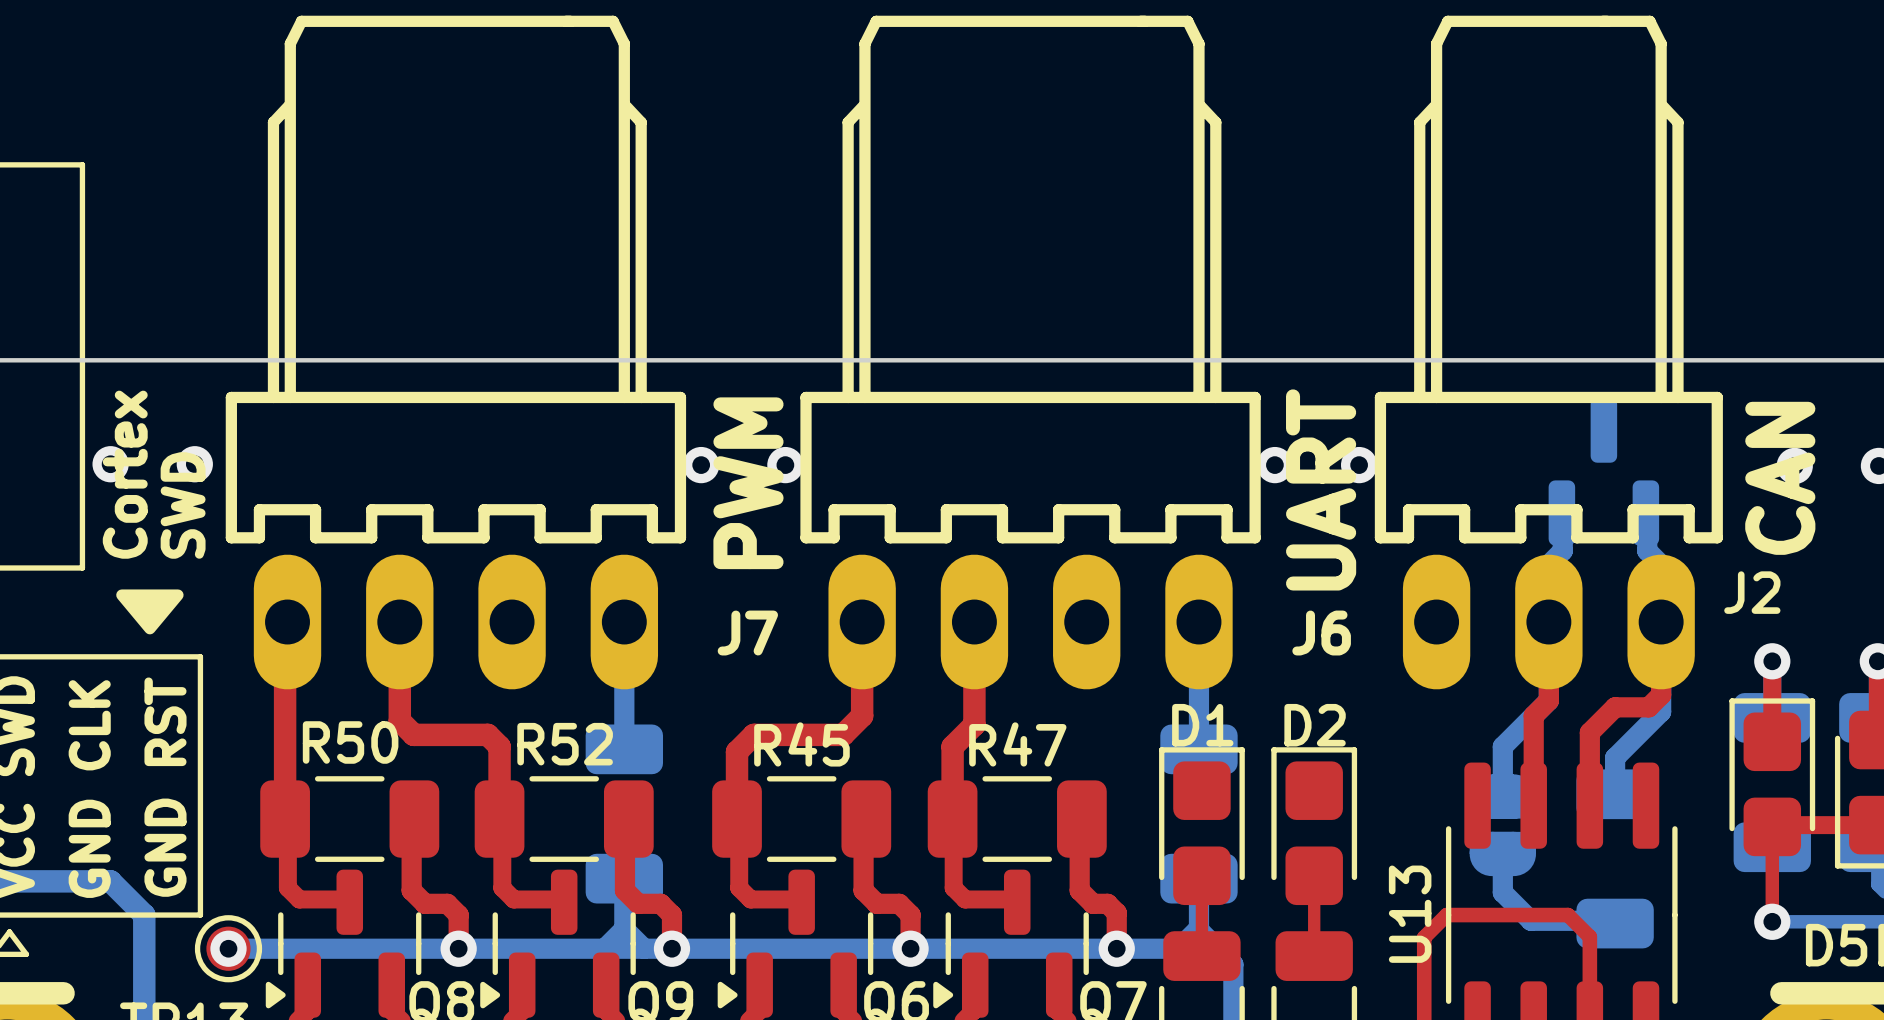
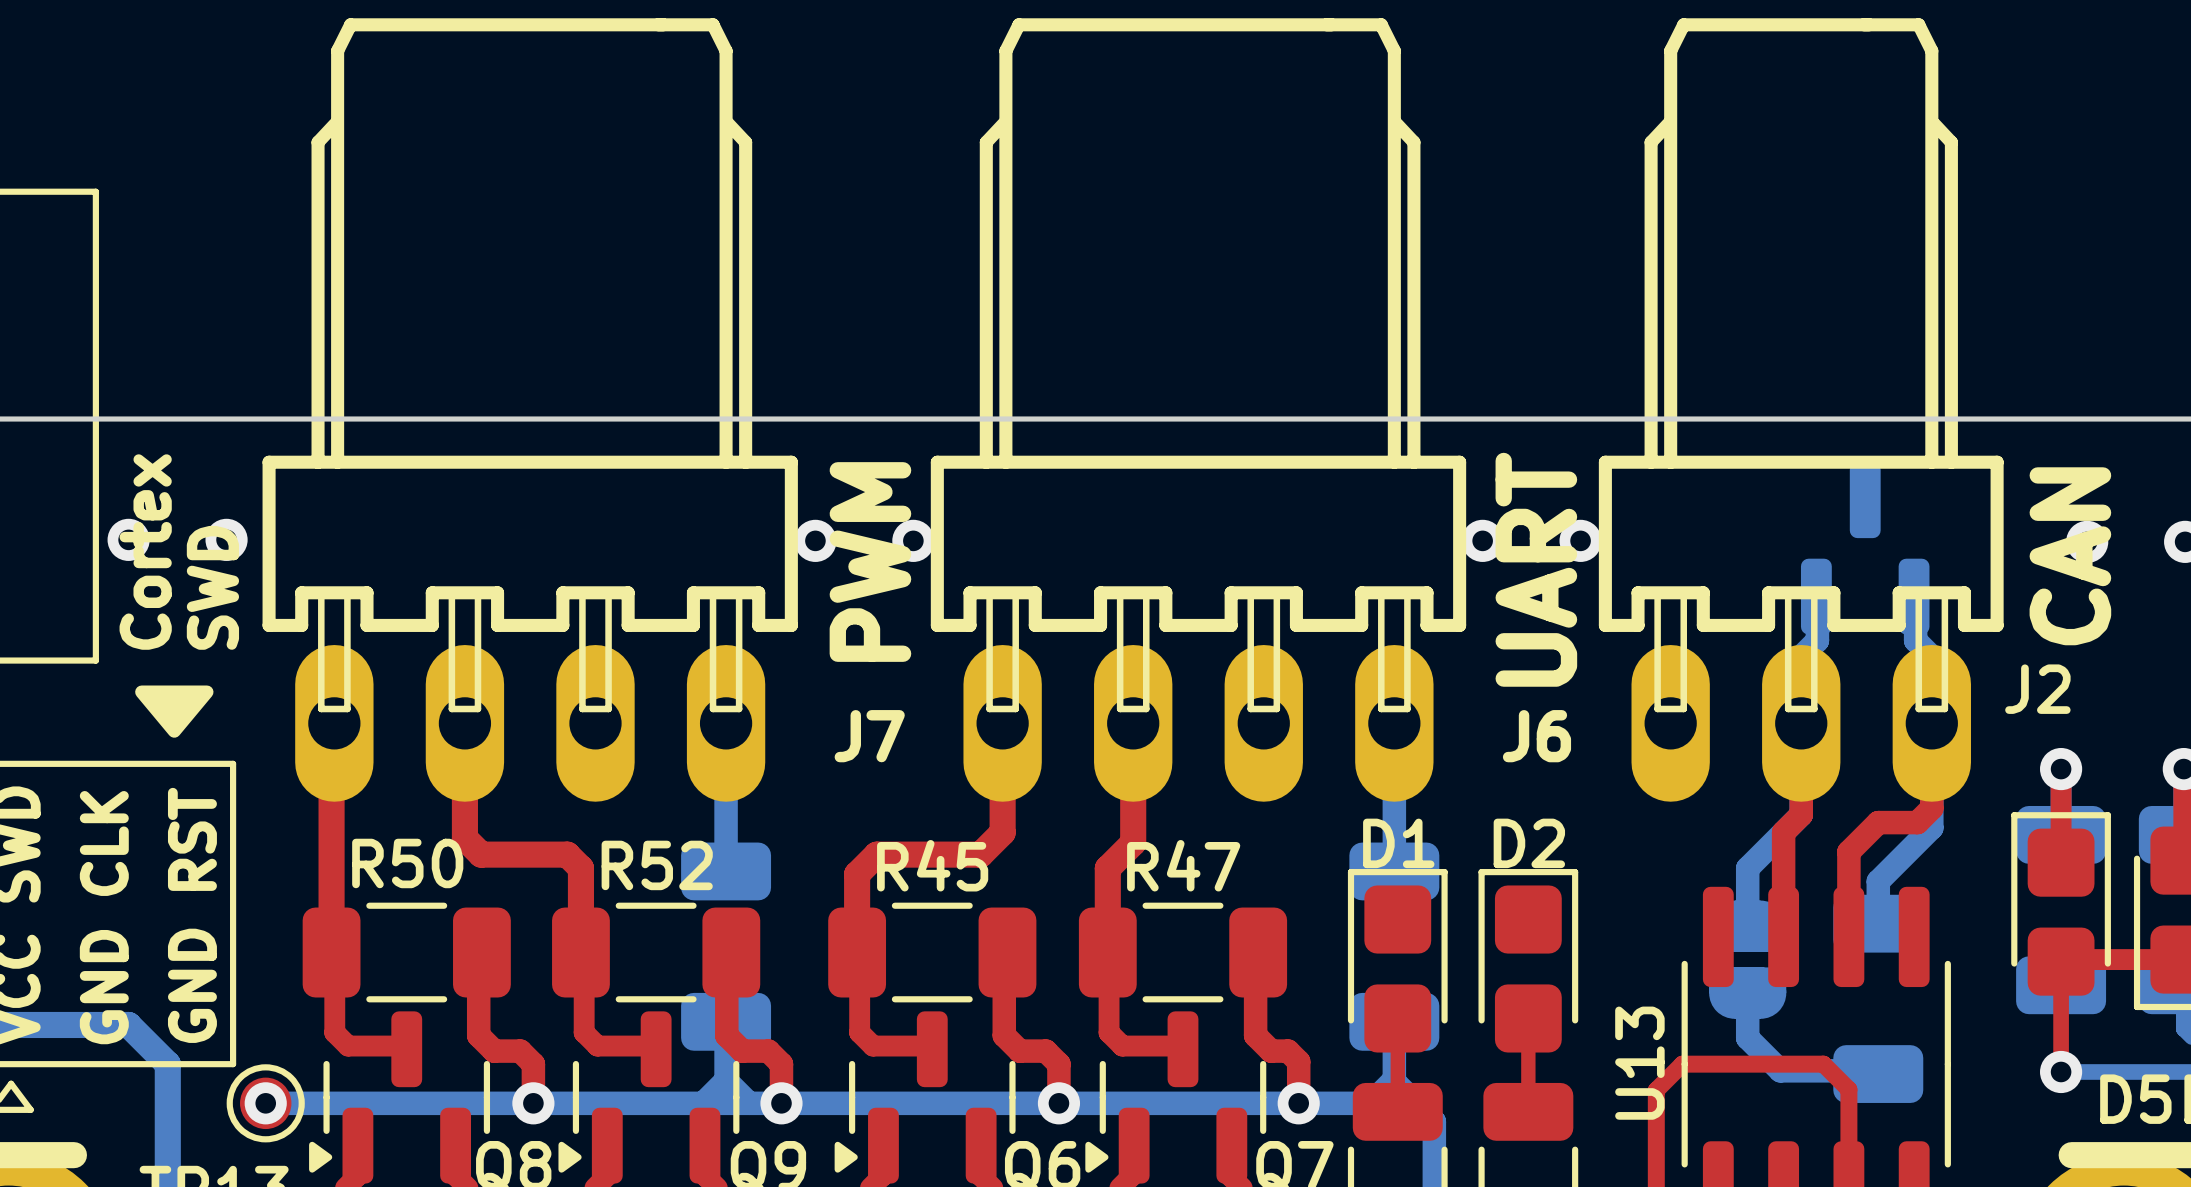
J7 footprint: [225, 15, 687, 690] -> [262, 18, 798, 802]
J6 footprint: [800, 15, 1261, 690] -> [930, 18, 1467, 802]
J2 footprint: [1374, 15, 1723, 690] -> [1598, 18, 2004, 802]

